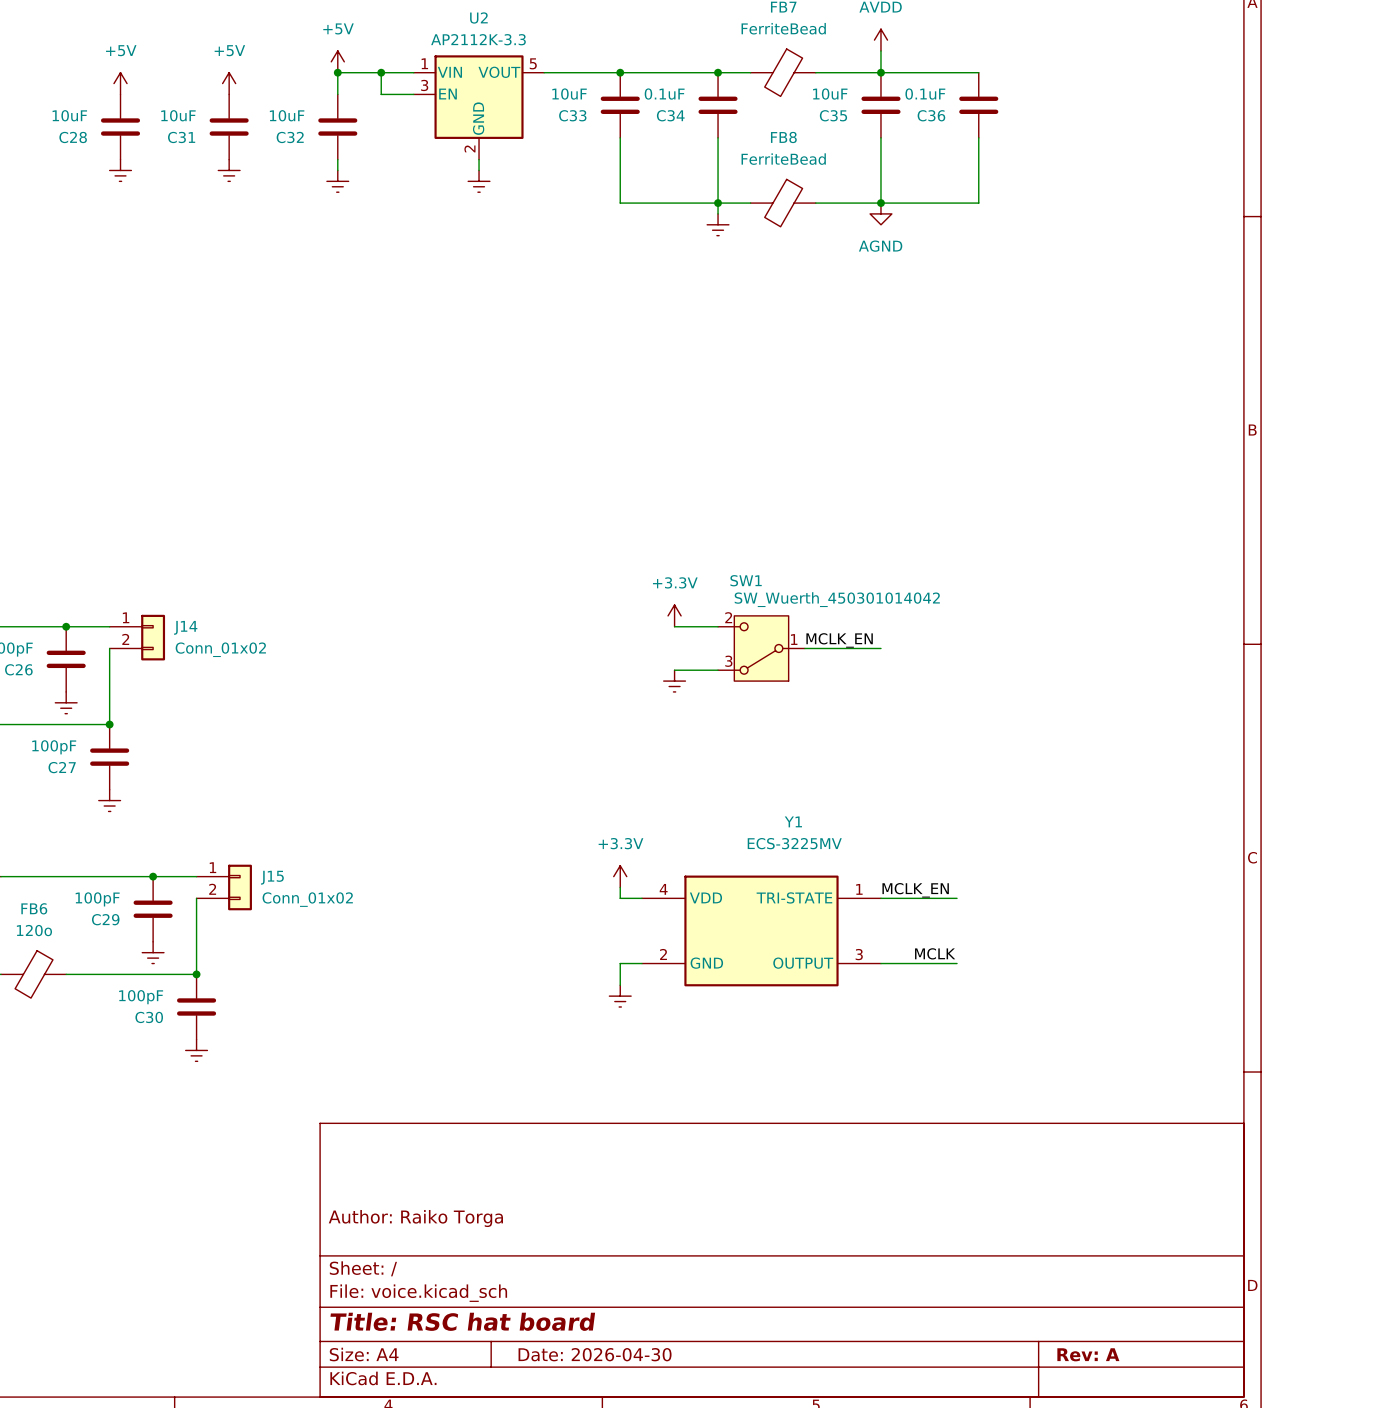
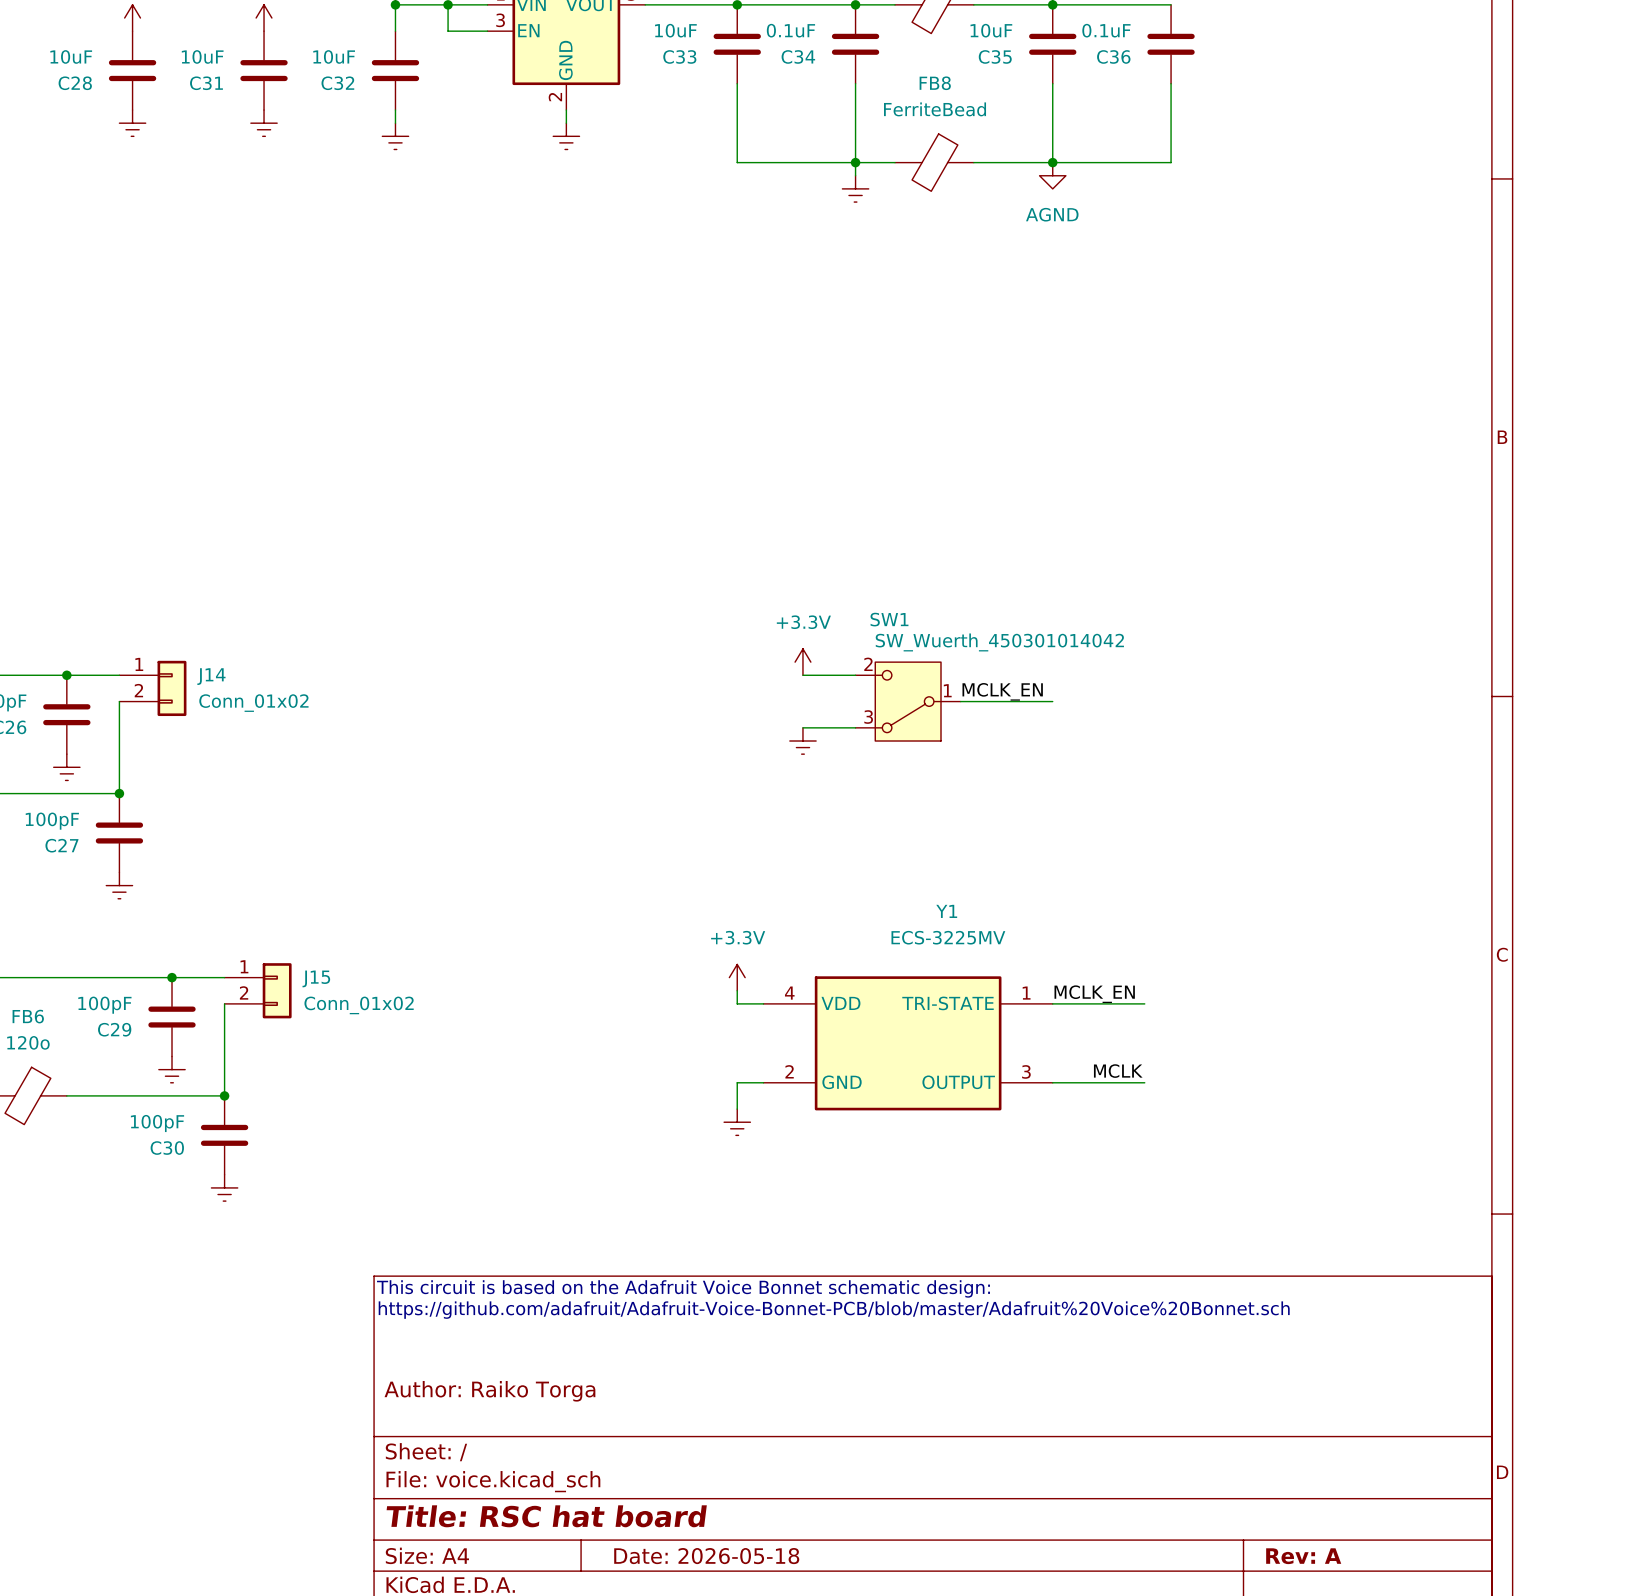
text: none -> This circuit is based on the Adafruit Voice Bonnet schematic design: (683, 1288)
text: none -> https://github.com/adafruit/Adafruit-Voice-Bonnet-PCB/blob/master/Adafruit%20Voice%20Bonnet.sch (834, 1310)
title block: Date: 2026-04-30 (595, 1354) -> Date: 2026-05-18 (706, 1556)

